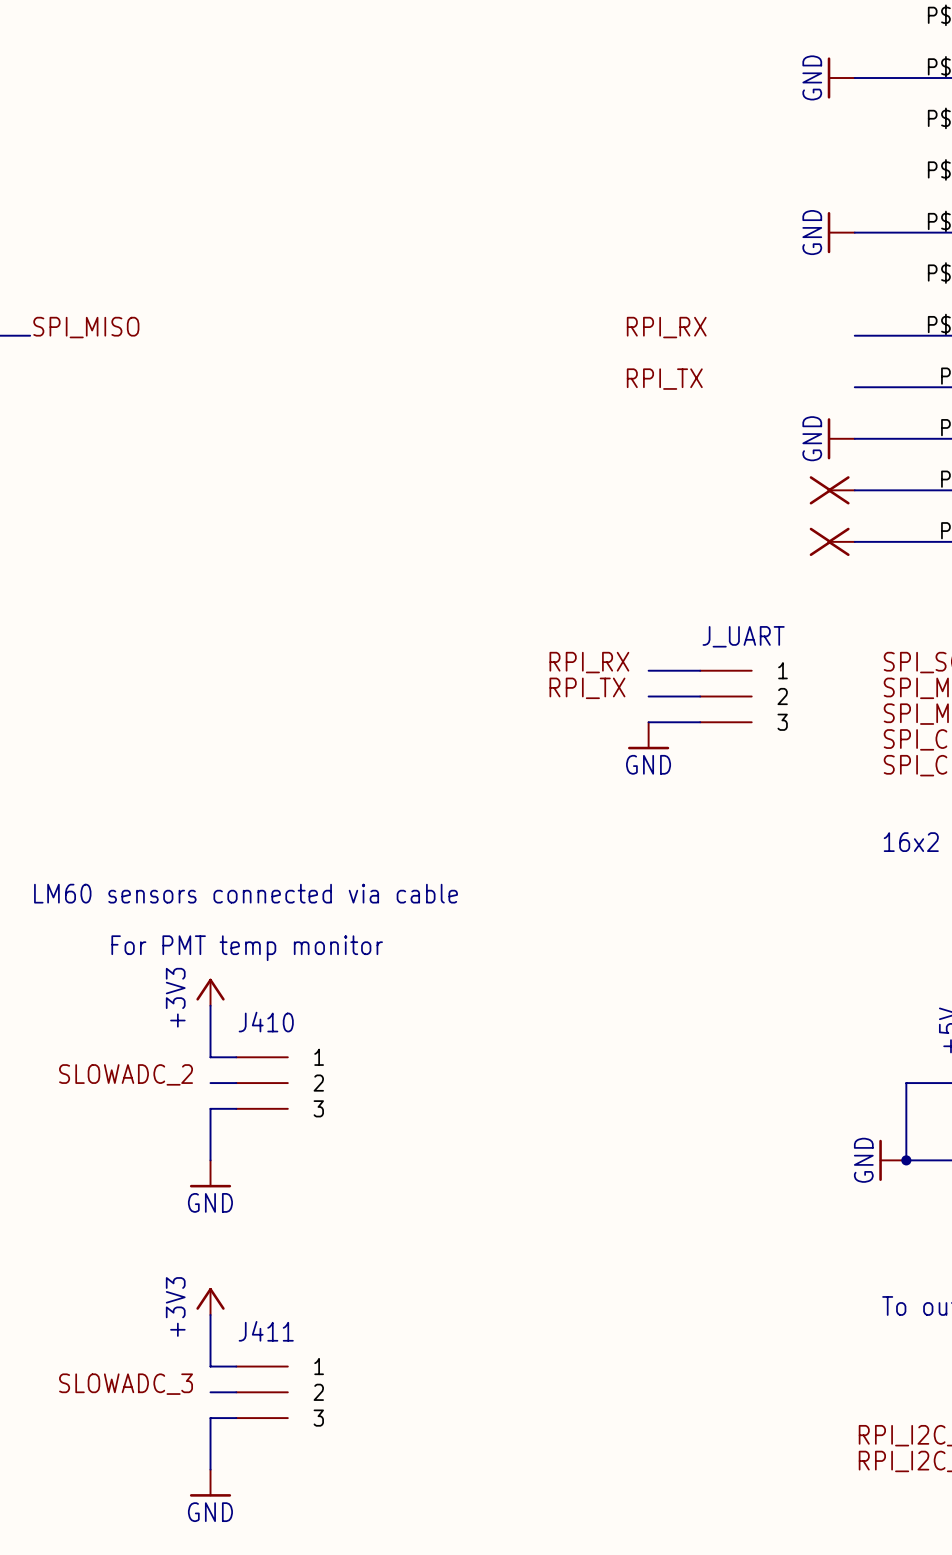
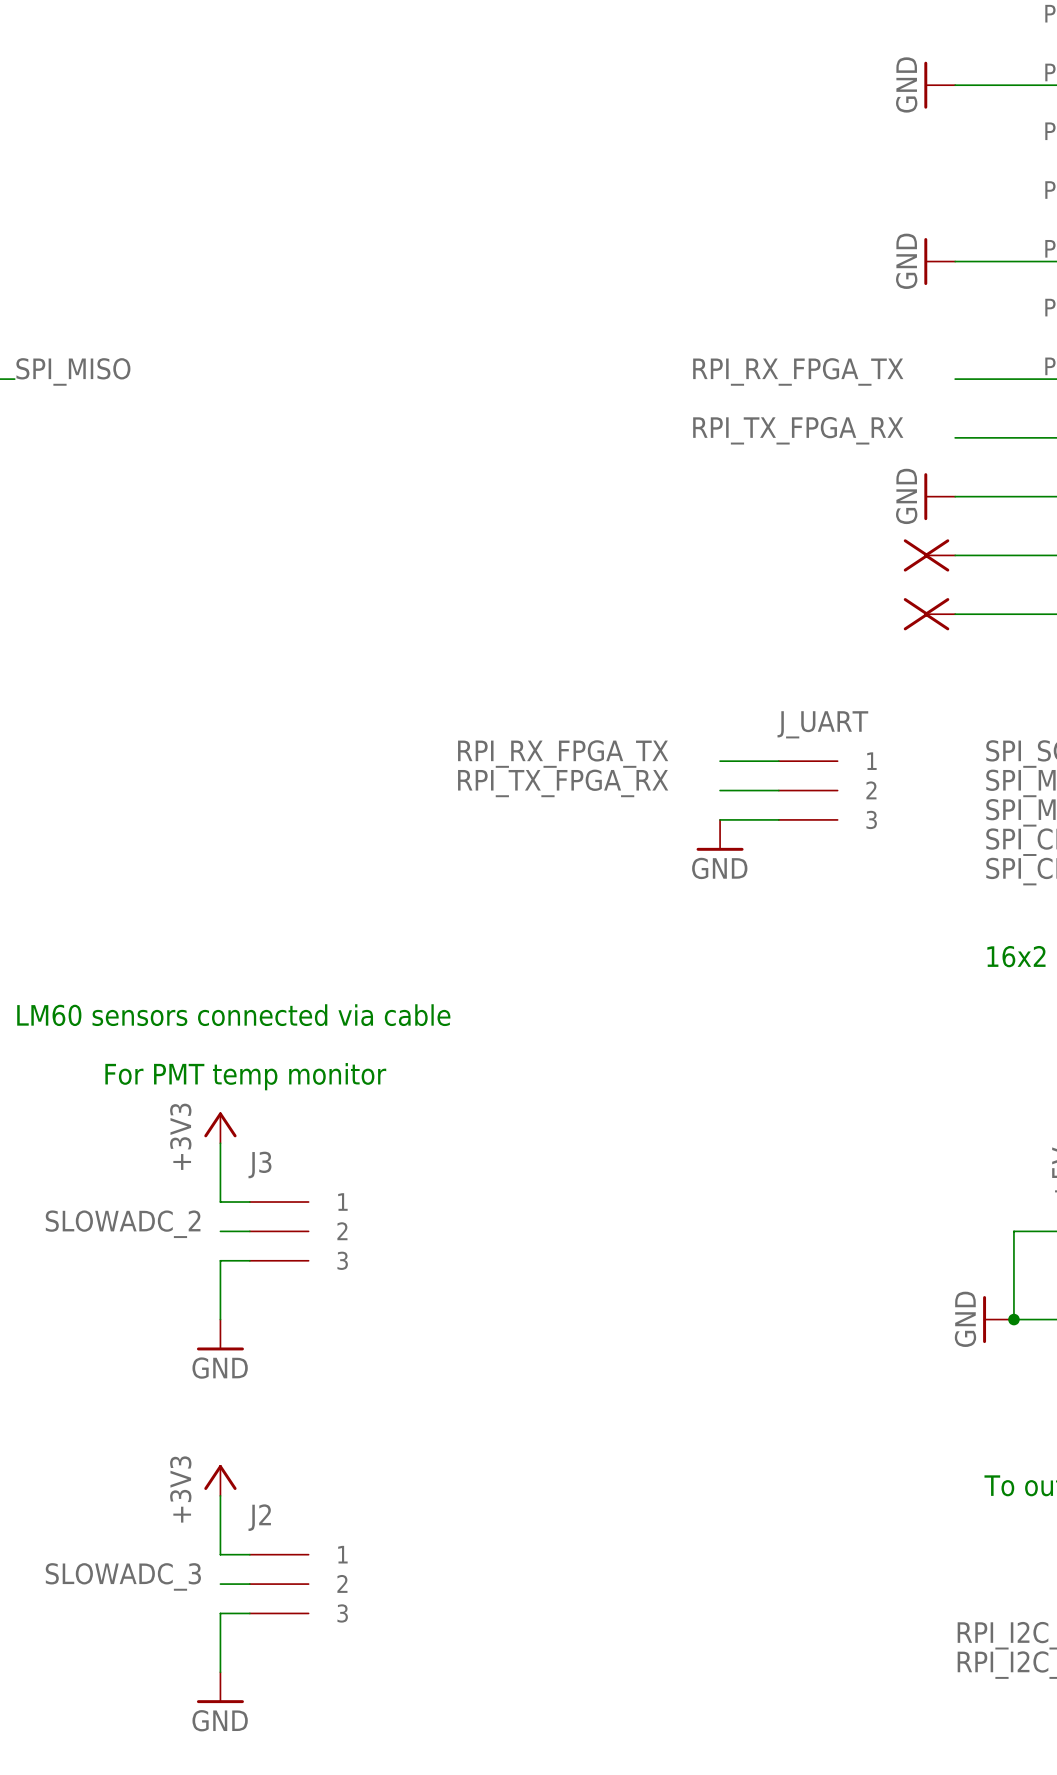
label: RPI_RX (666, 327) -> RPI_RX_FPGA_TX (798, 371)
label: RPI_TX (664, 379) -> RPI_TX_FPGA_RX (798, 430)
label: none -> RPI_RX_FPGA_TX (563, 754)
label: RPI_RX (589, 662) -> none
label: none -> RPI_TX_FPGA_RX (563, 783)
label: RPI_TX (587, 688) -> none
J410 name: J410 (266, 1022) -> J3 (259, 1164)
J411 name: J411 (266, 1331) -> J2 (259, 1517)

